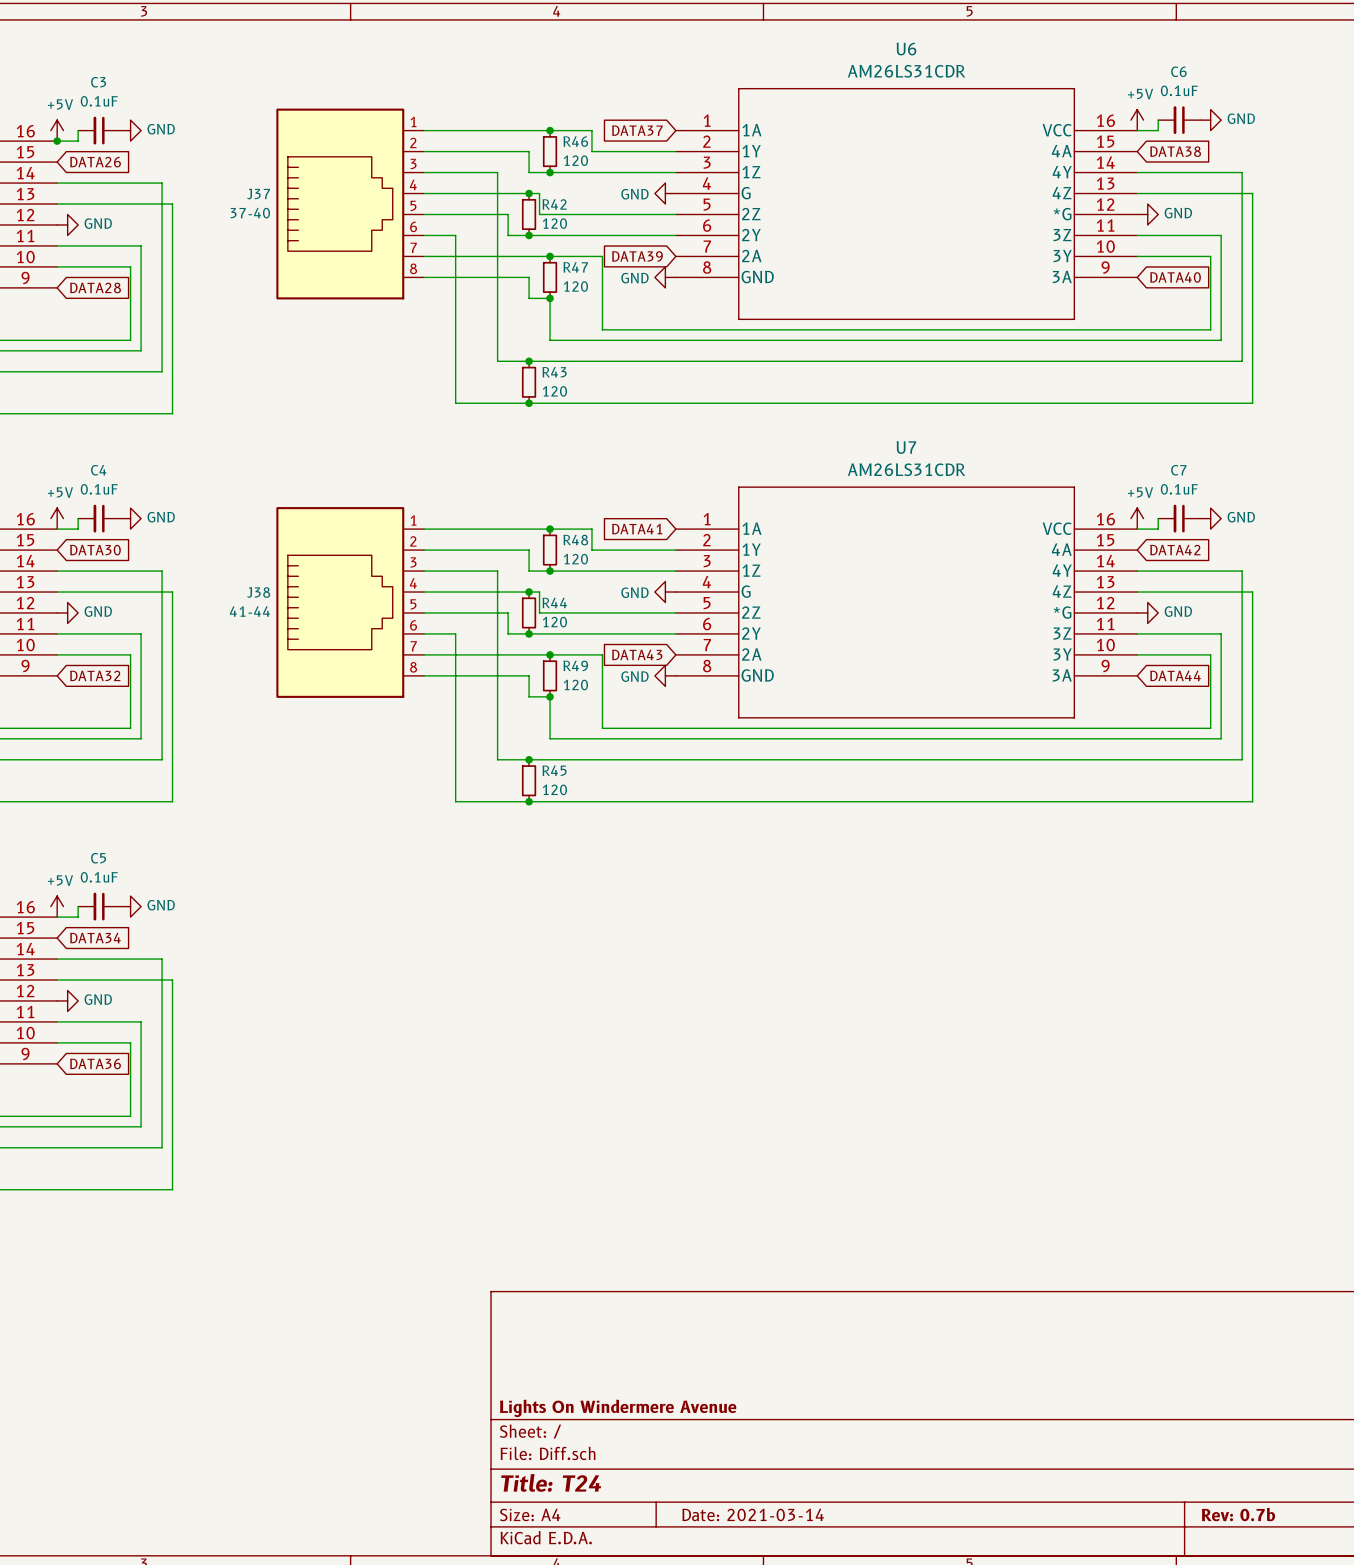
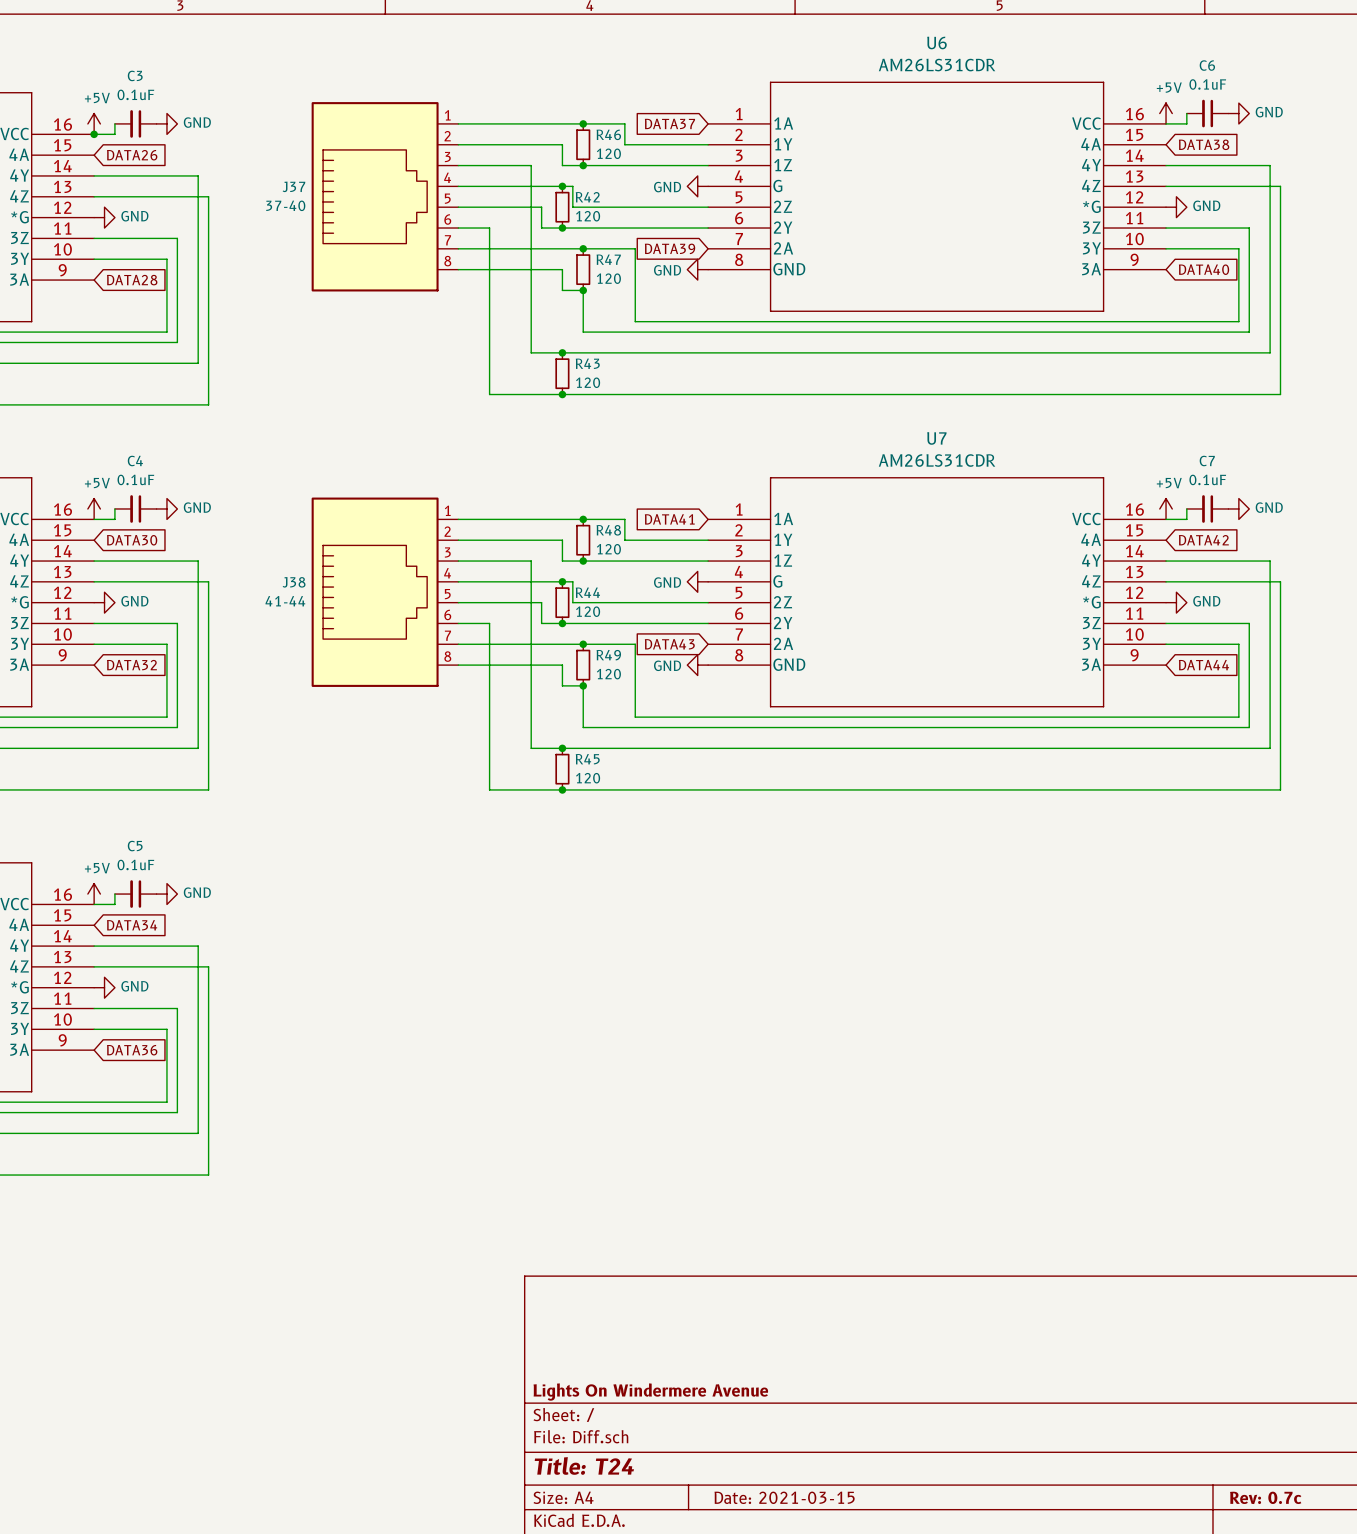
title block: Date: 2021-03-14 (753, 1514) -> Date: 2021-03-15 (784, 1497)
title block: Rev: 0.7b (1238, 1514) -> Rev: 0.7c (1265, 1497)

